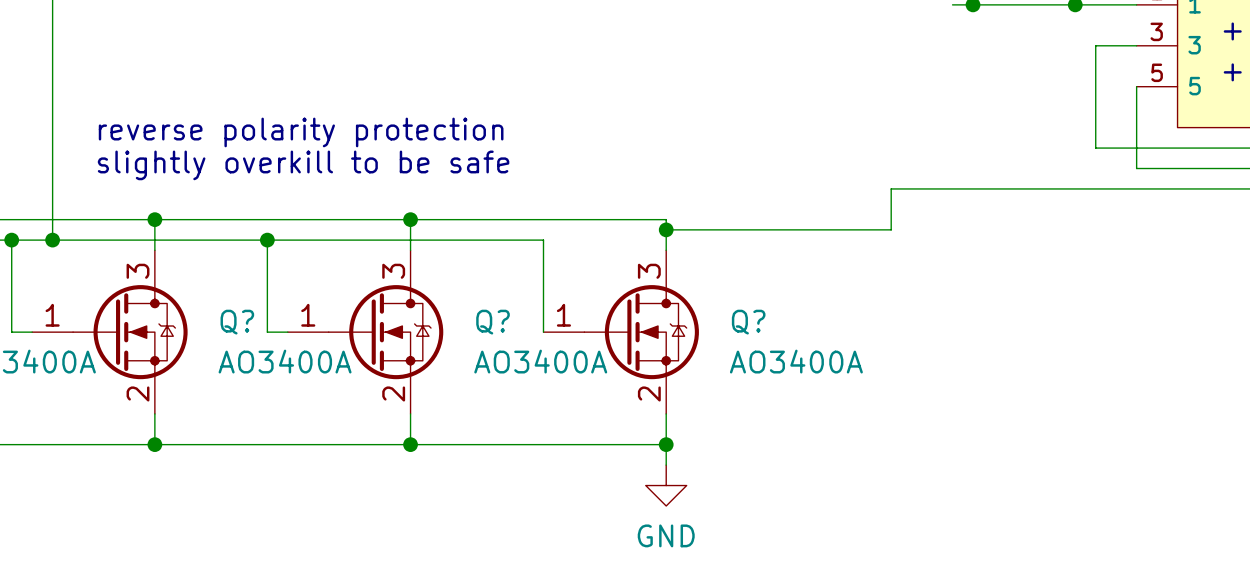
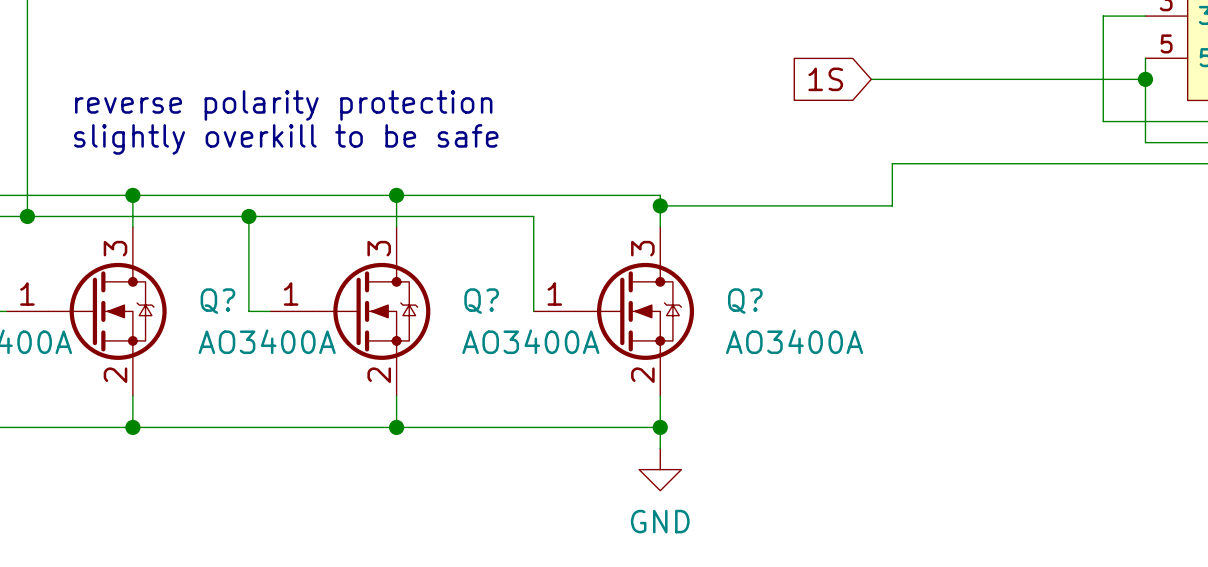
global label: none -> 1S (825, 79)
wire: none -> (871, 79) (1145, 79)
junction: none -> (1145, 79)

